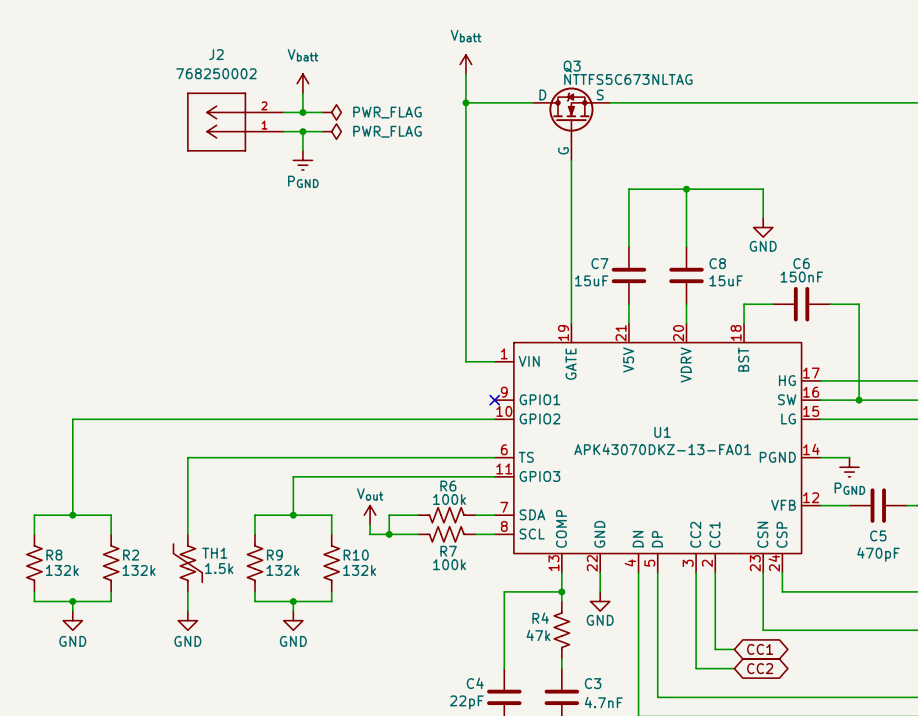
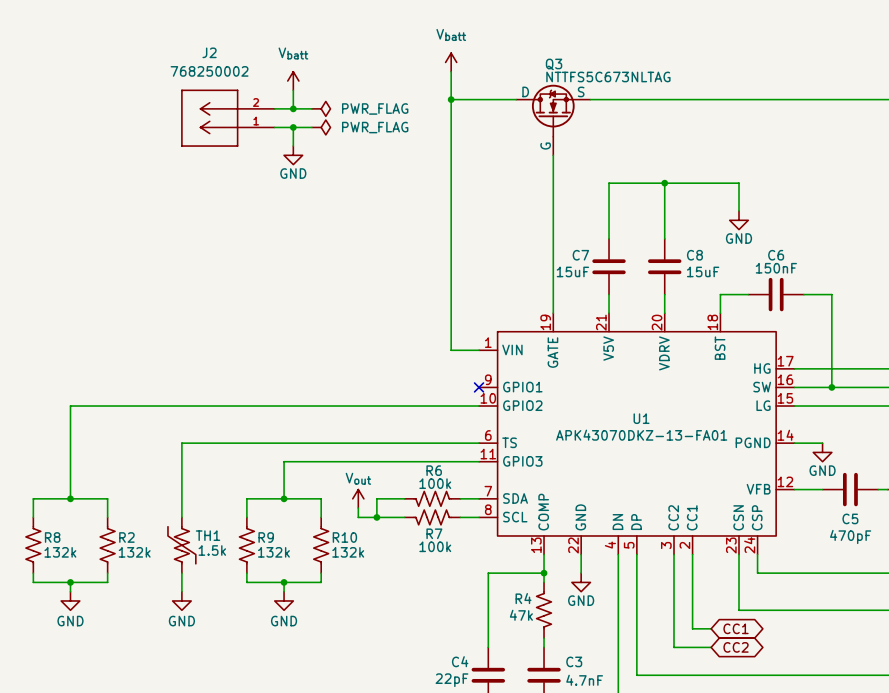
power symbol: PGND (302, 160) -> GND (293, 155)
power symbol: PGND (849, 467) -> GND (822, 452)

